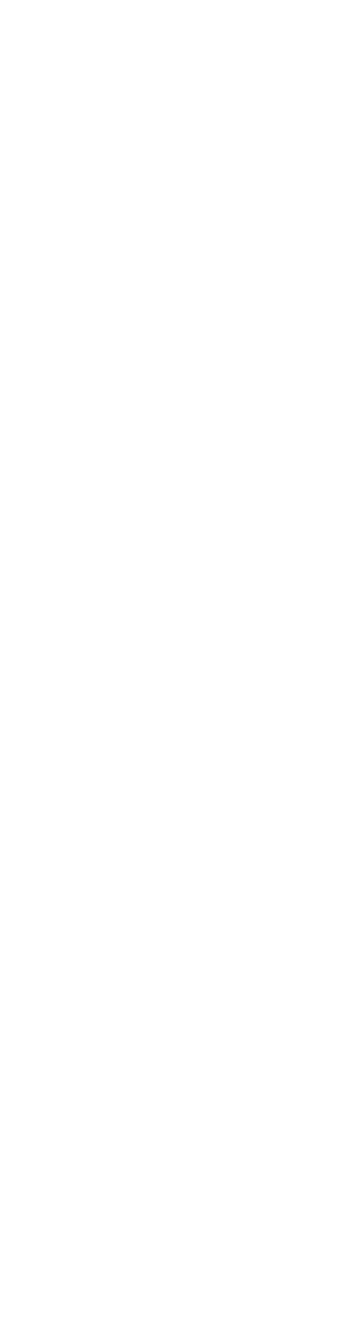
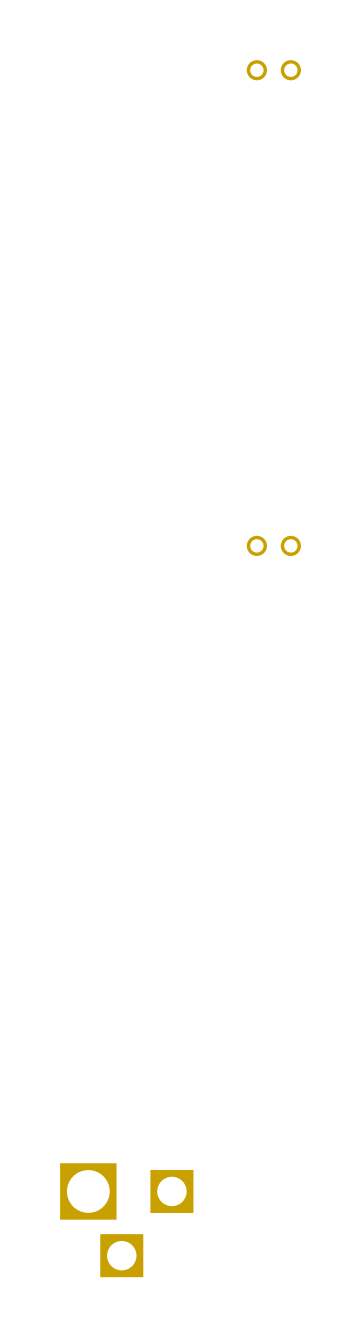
part: none -> (273, 70)
part: none -> (273, 545)
part: none -> (126, 1220)

